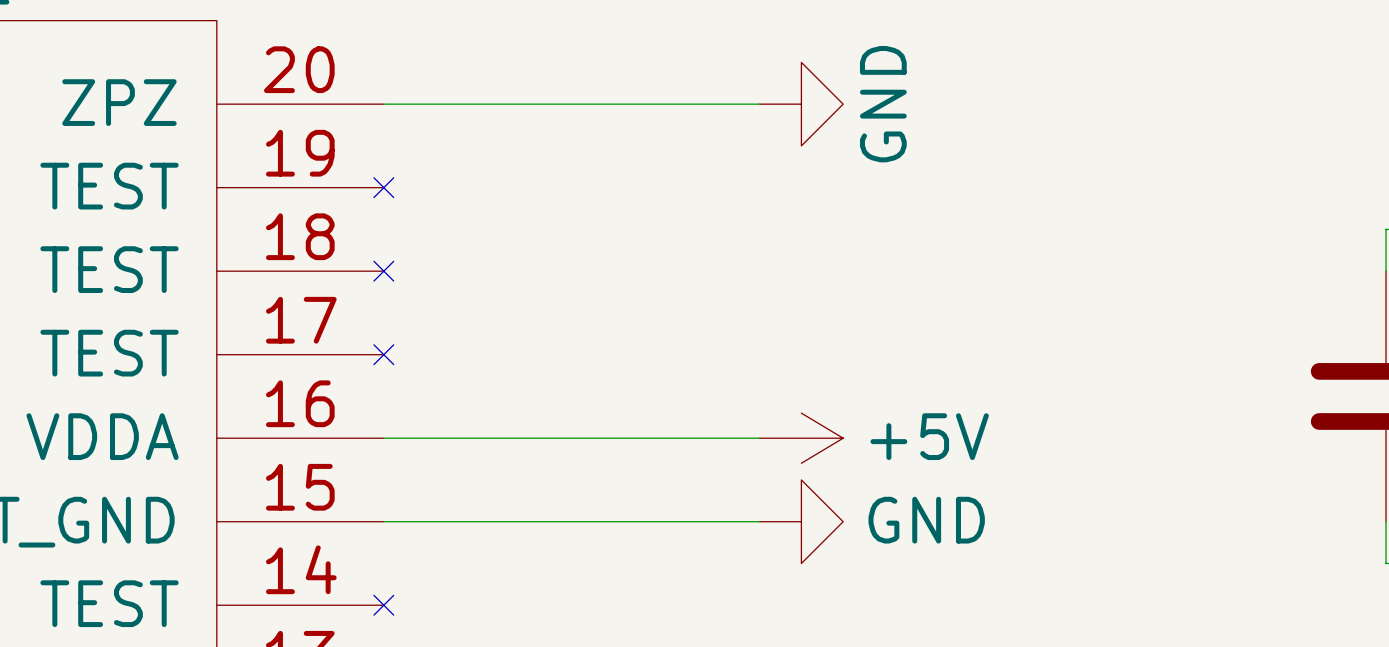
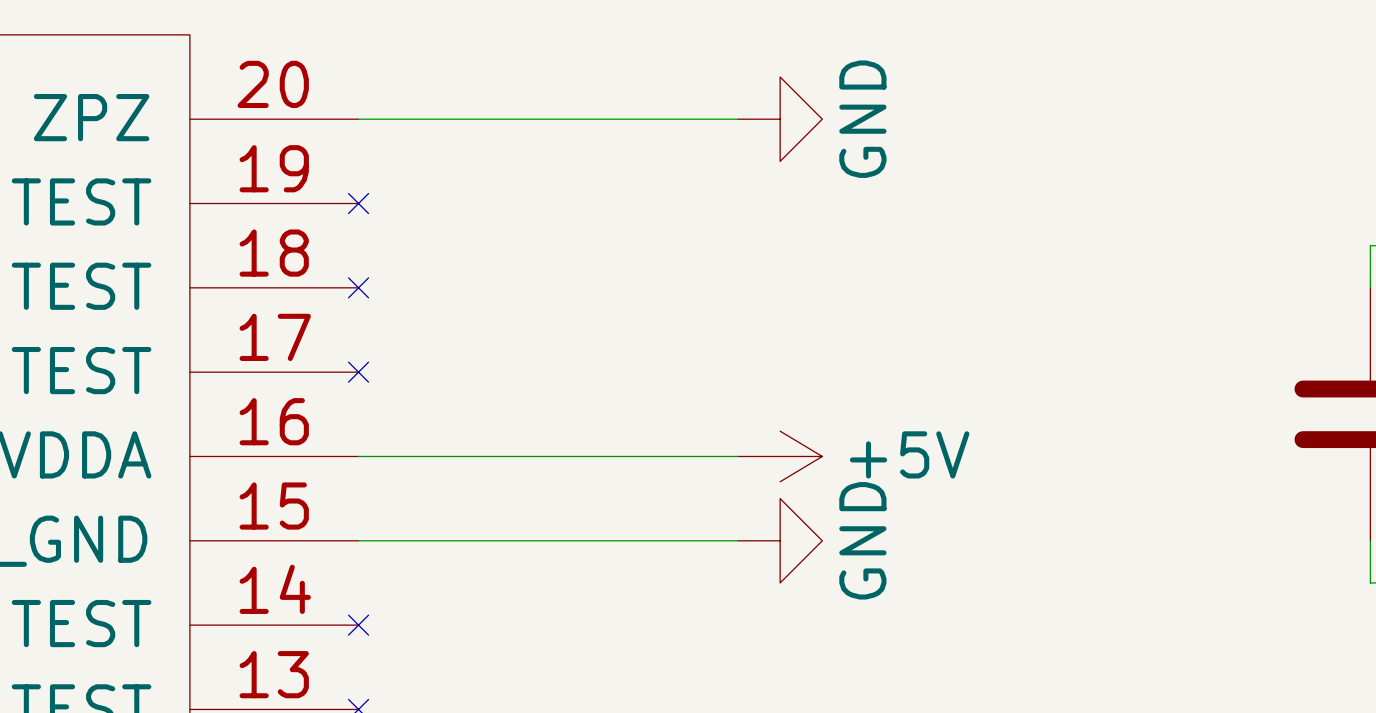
power symbol text rotation: 0° (926, 520) -> 90° counterclockwise (862, 540)

